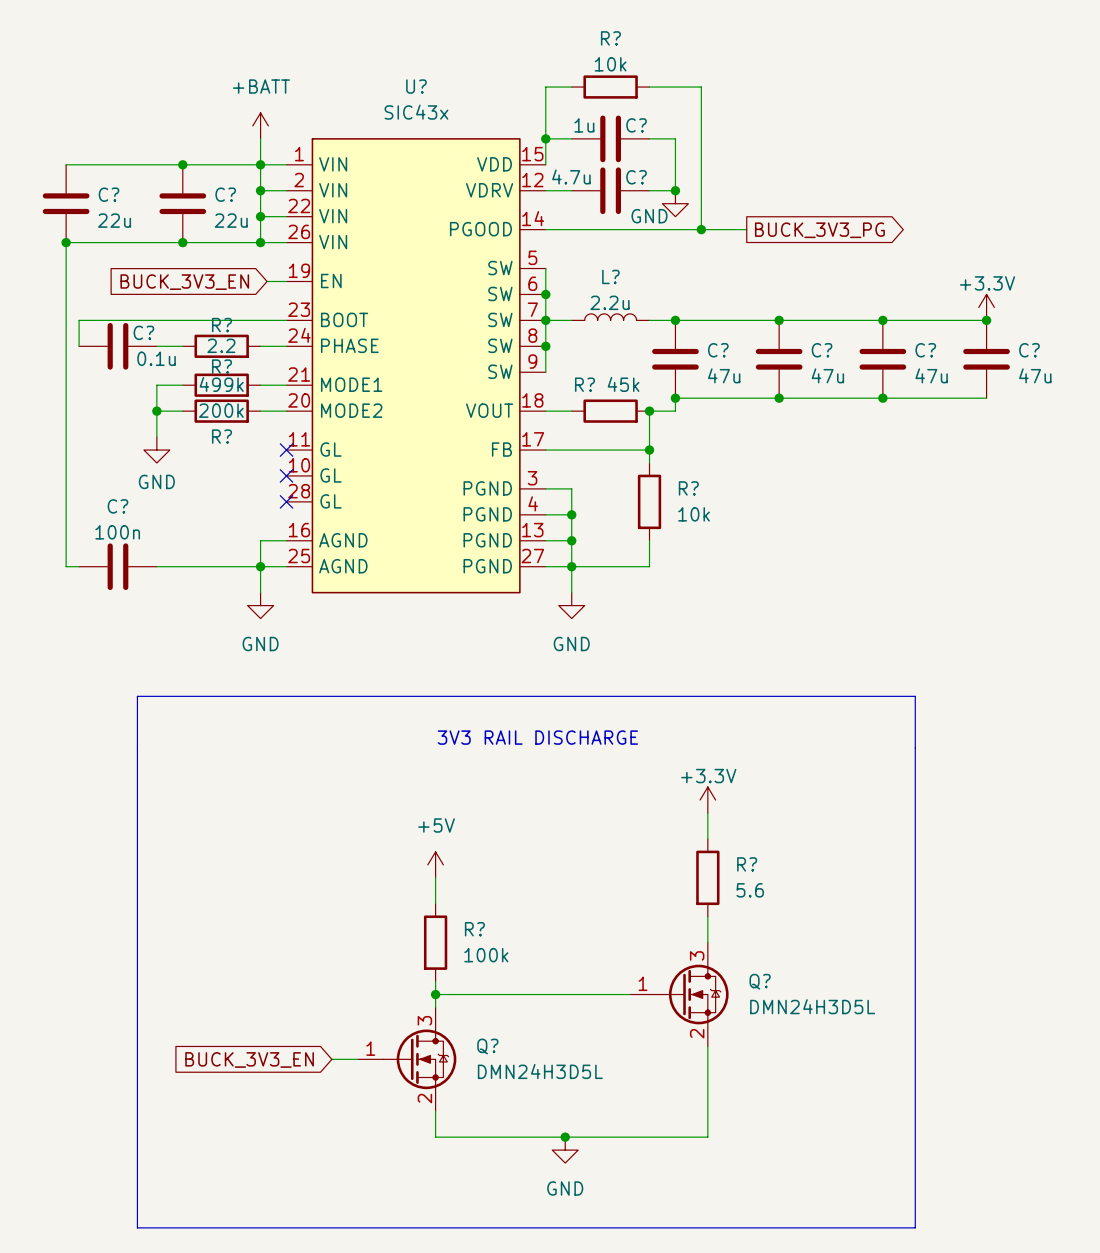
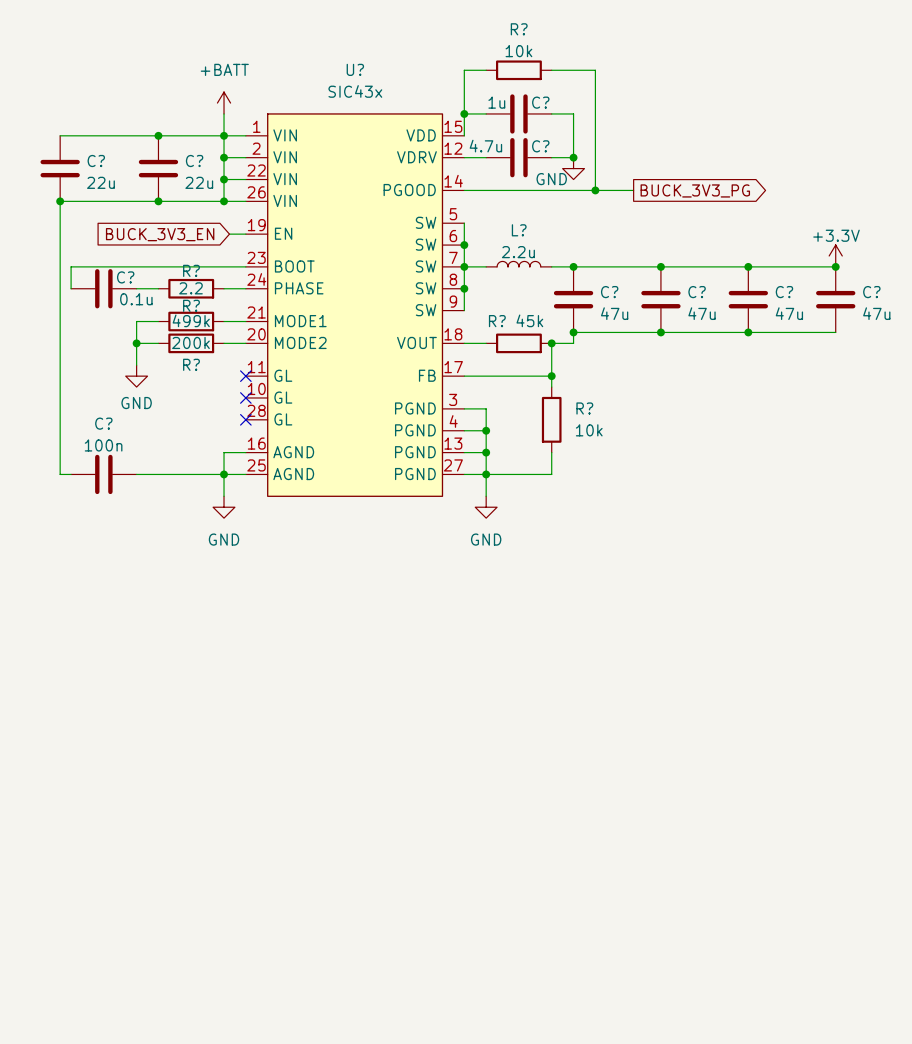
line: (137, 696) (137, 1227) (915, 1227) (915, 696) (137, 696) -> none
text: 3V3 RAIL DISCHARGE (537, 737) -> none
power symbol: +3.3V (707, 800) -> none
wire: (707, 813) (707, 838) -> none
power symbol: +5V (435, 864) -> none
wire: (435, 877) (435, 903) -> none
R?: 5.6 (707, 877) -> none
wire: (707, 916) (707, 942) -> none
R?: 100k (435, 942) -> none
wire: (435, 981) (435, 1007) -> none
wire: (435, 994) (630, 994) -> none
junction: (435, 994) -> none
Q?: DMN24H3D5L (679, 994) -> none
wire: (707, 1046) (707, 1137) (435, 1137) (435, 1111) -> none
global label: BUCK_3V3_EN (249, 1059) -> none
wire: (331, 1059) (357, 1059) -> none
Q?: DMN24H3D5L (407, 1059) -> none
junction: (565, 1137) -> none
power symbol: GND (565, 1150) -> none

